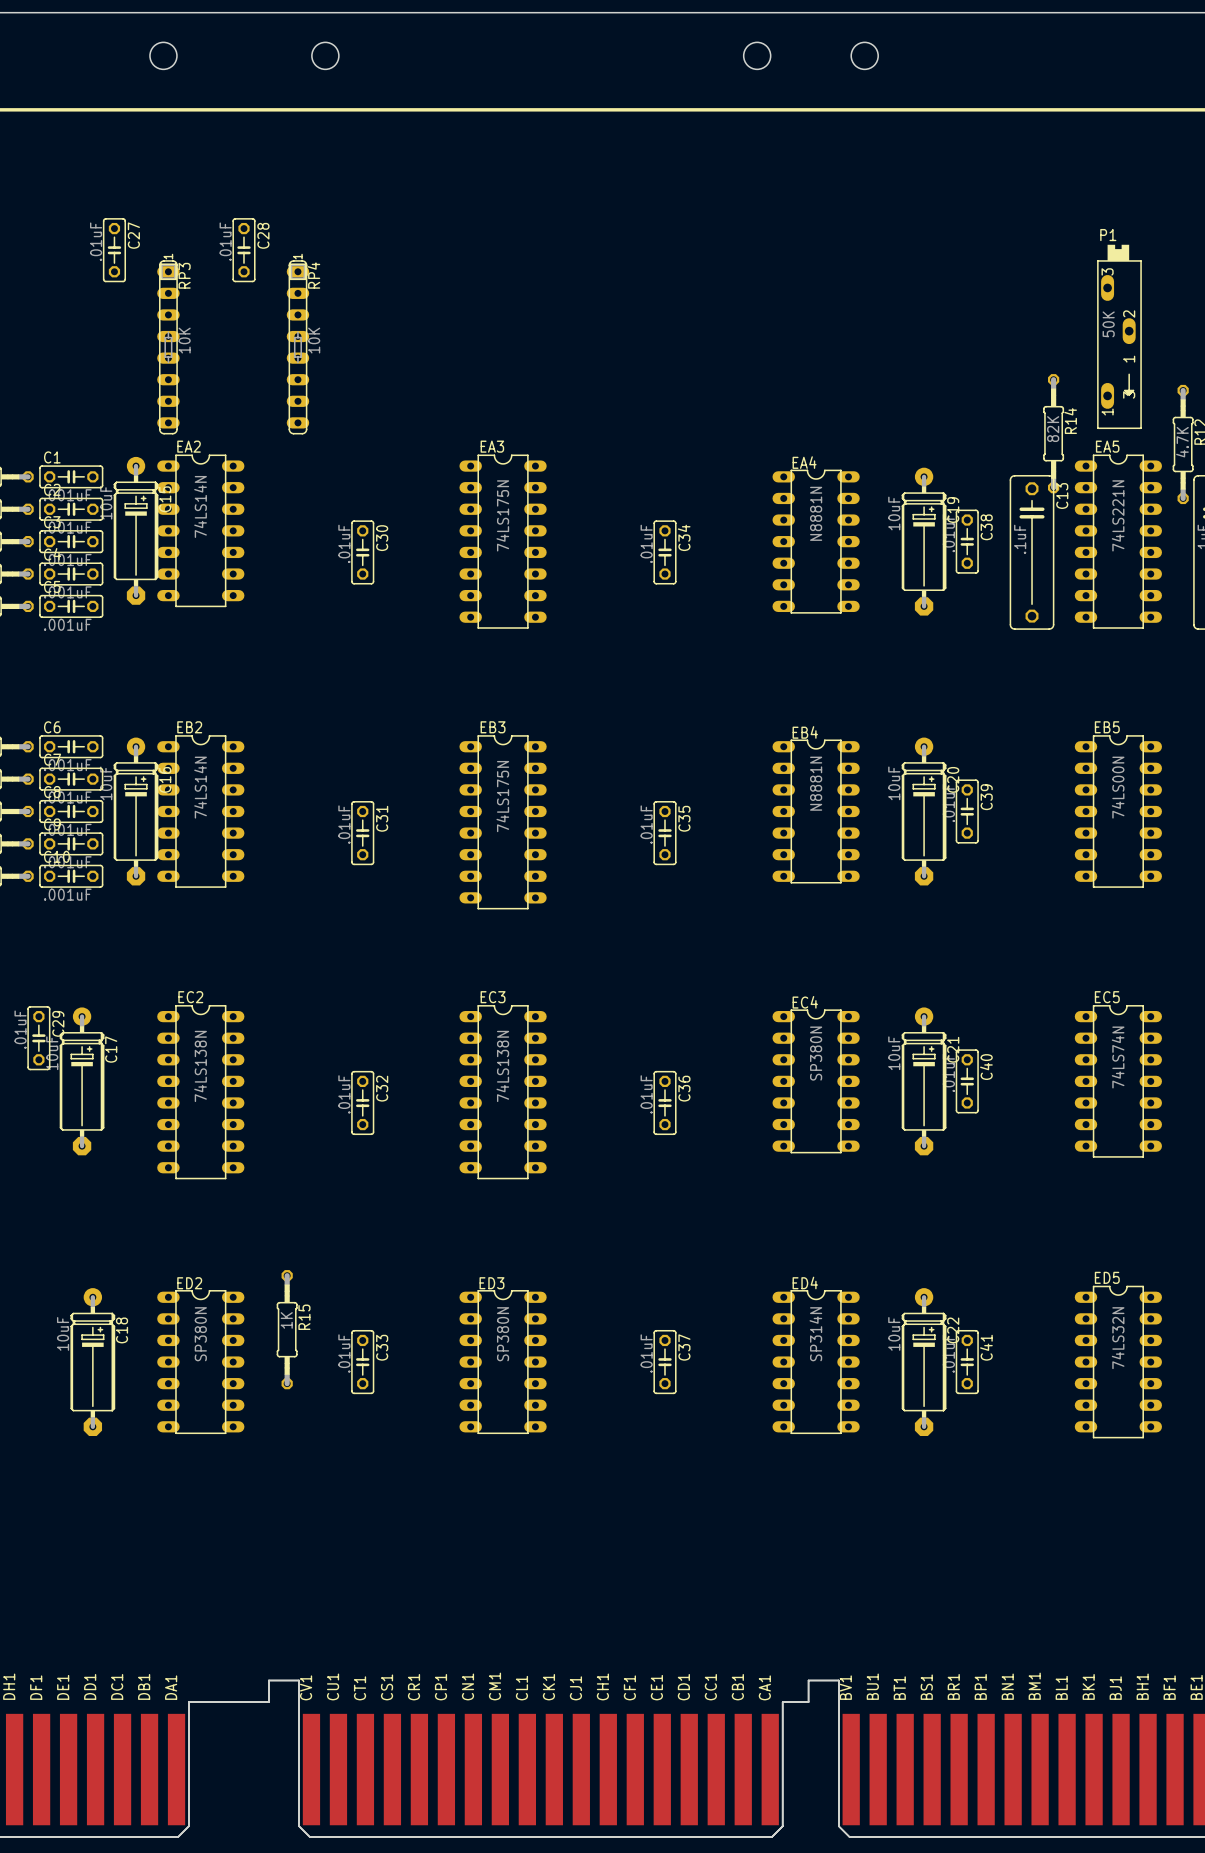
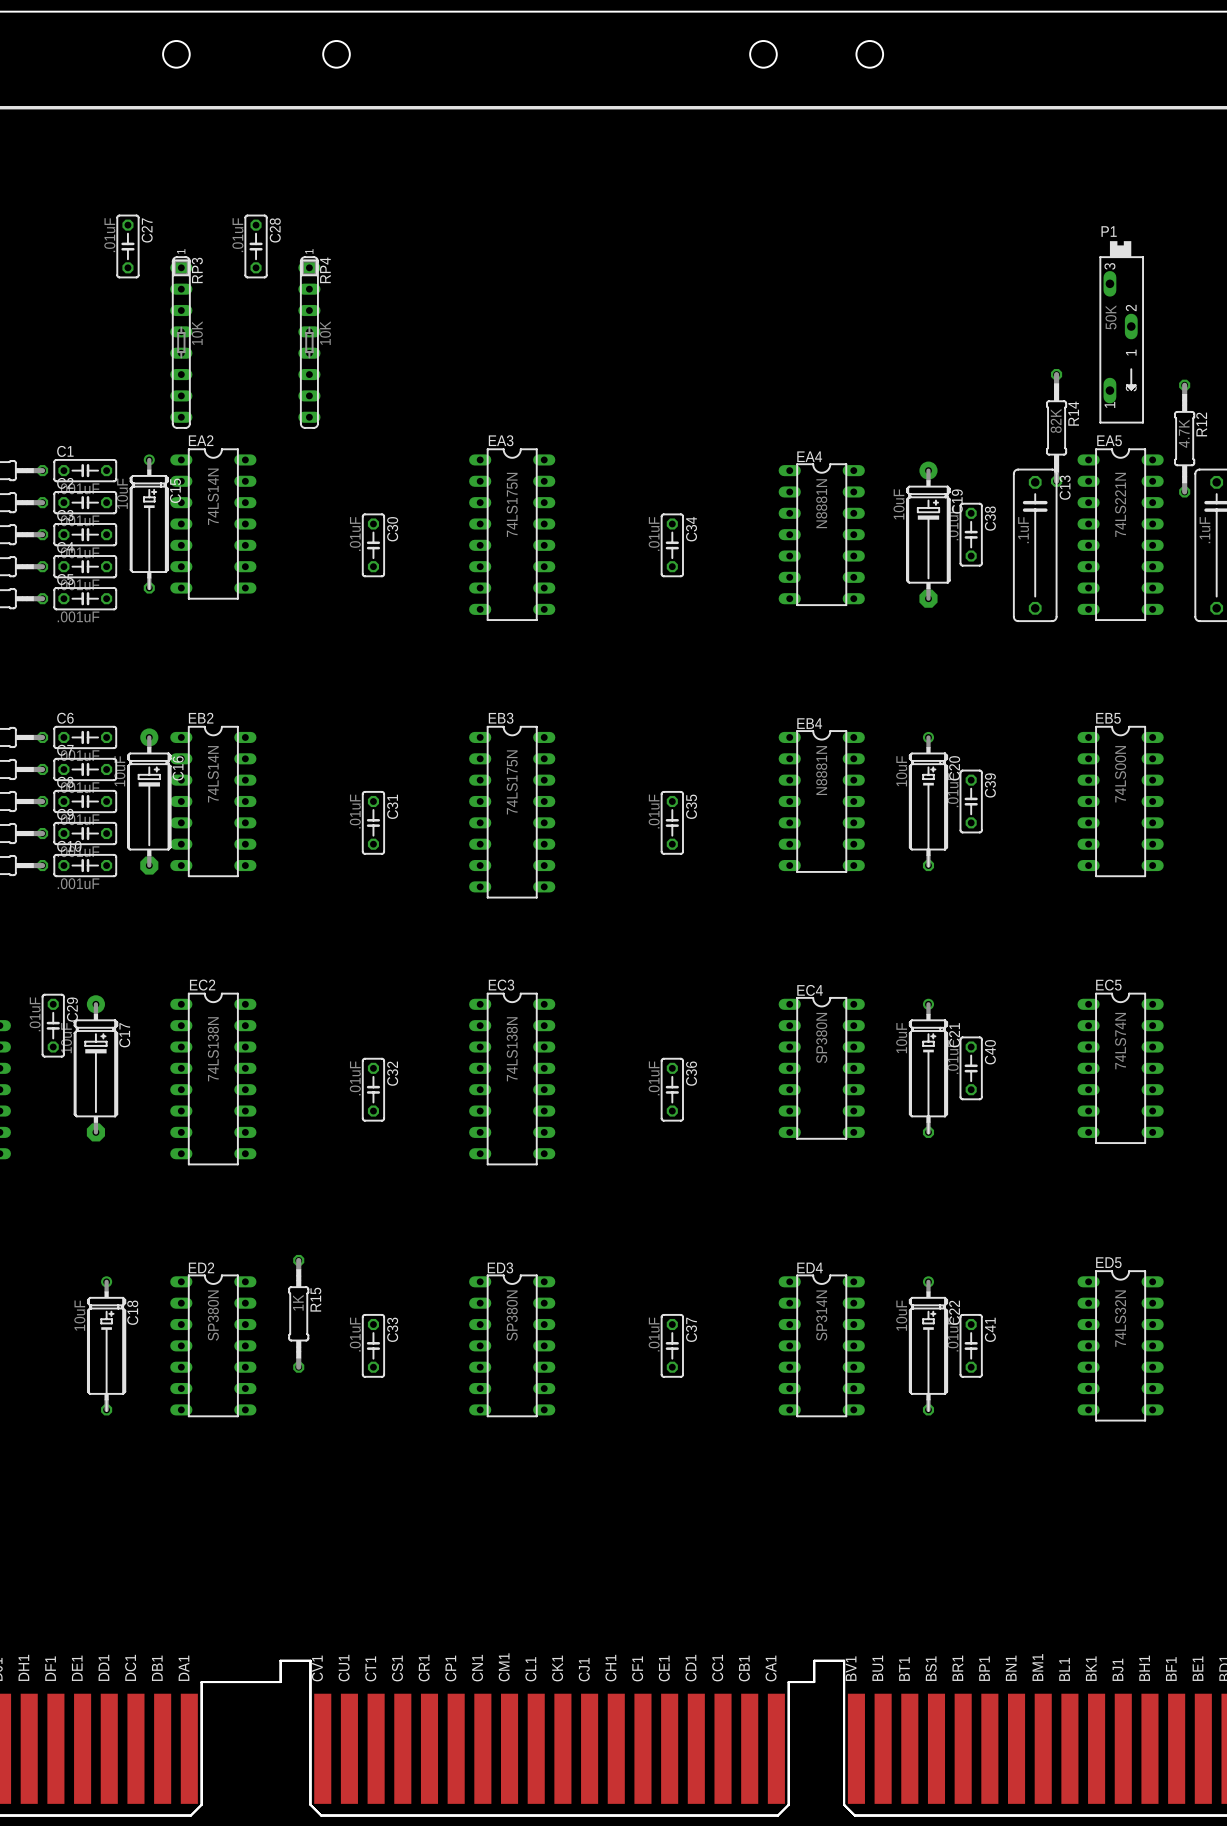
C15 footprint: [113, 456, 159, 605] -> [129, 454, 169, 594]
C20 footprint: [901, 737, 947, 886] -> [909, 731, 948, 872]
C21 footprint: [901, 1007, 947, 1156] -> [909, 998, 948, 1138]
C18 footprint: [70, 1288, 116, 1436] -> [87, 1276, 126, 1416]
C22 footprint: [901, 1288, 947, 1436] -> [909, 1276, 948, 1416]

